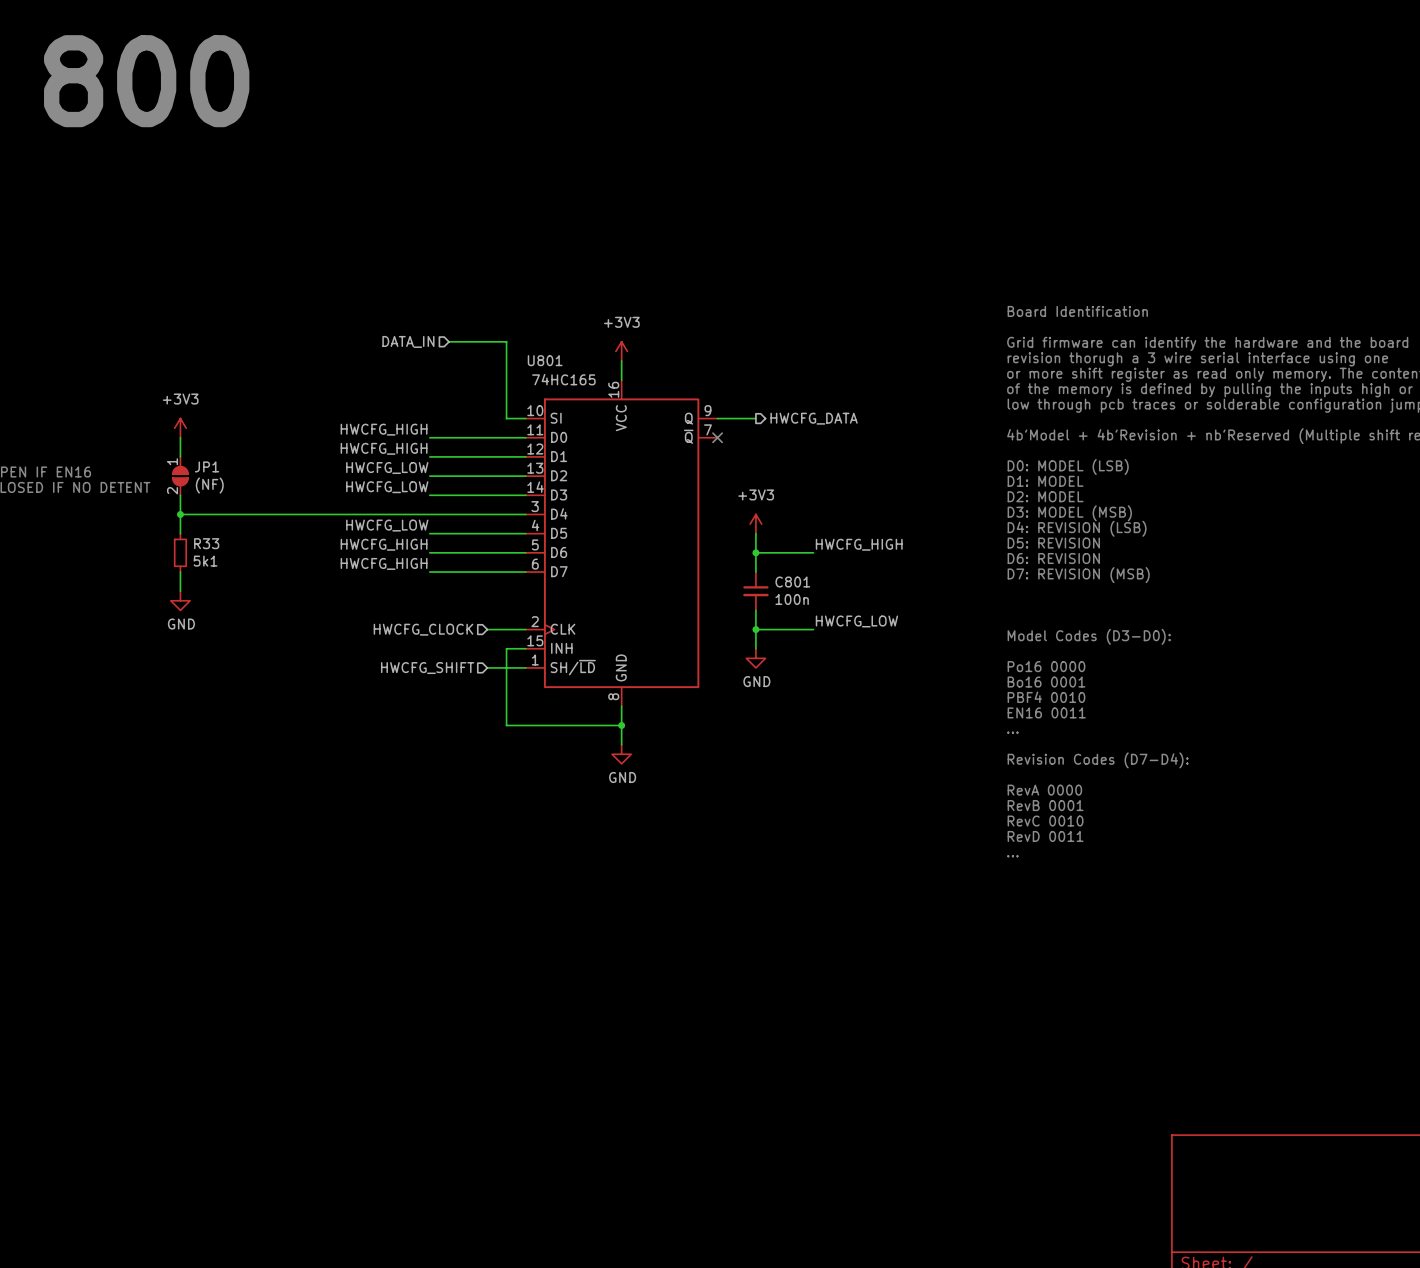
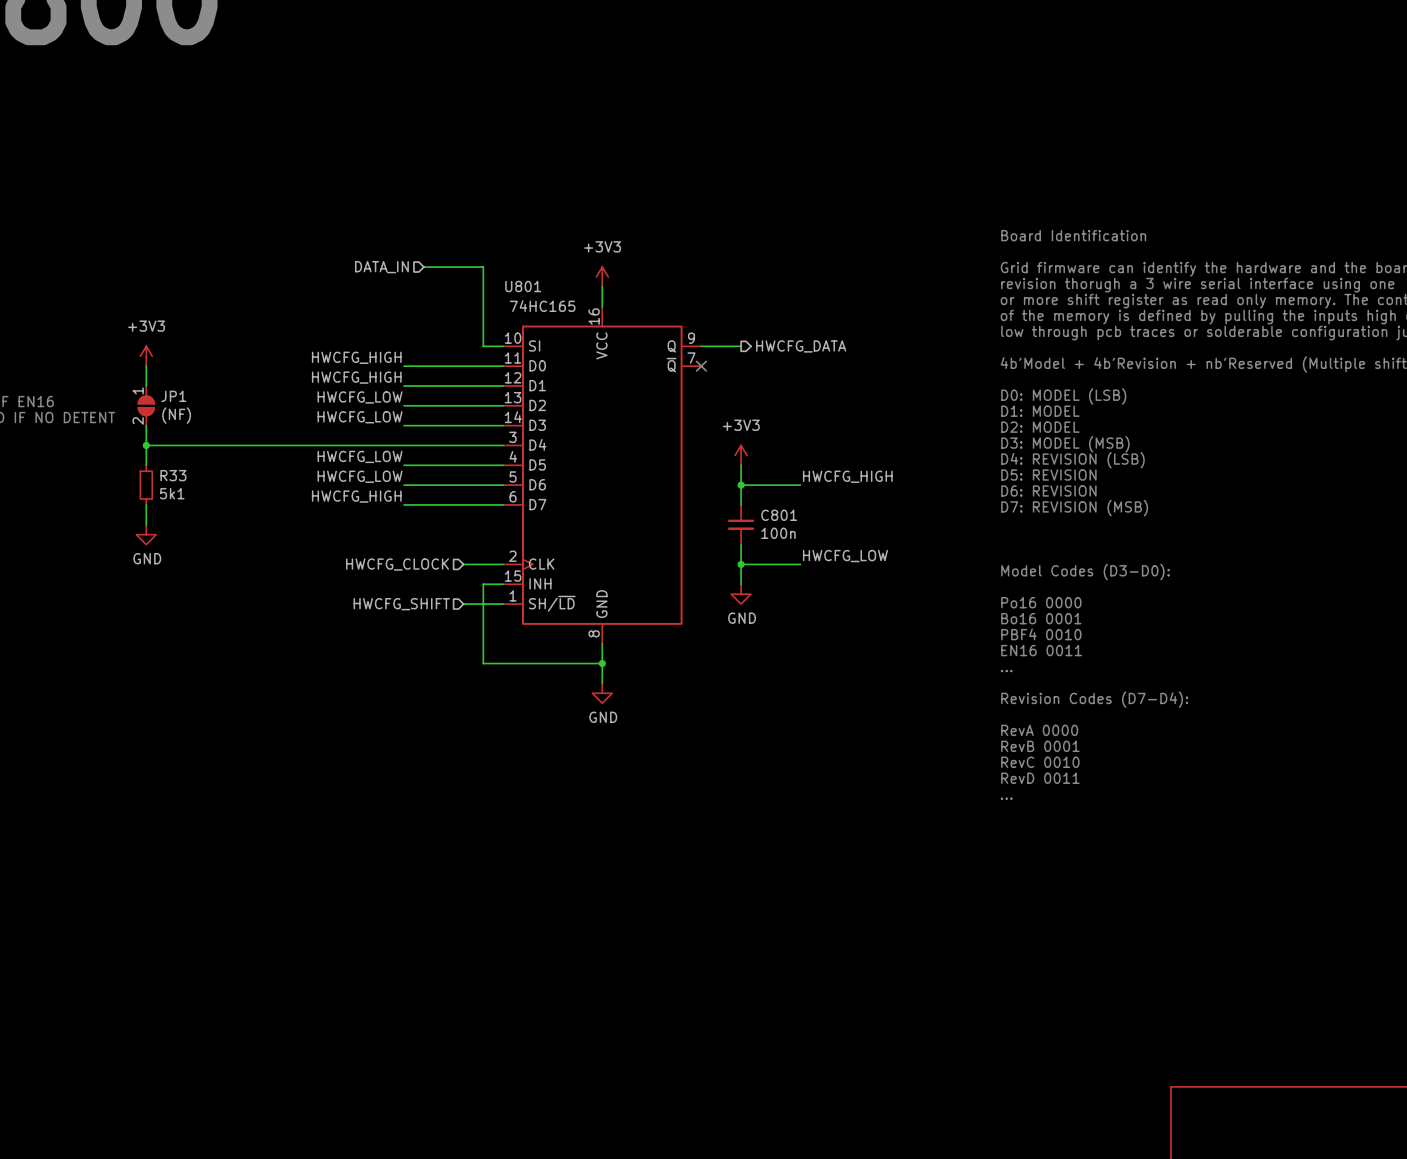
label: HWCFG_HIGH (384, 544) -> HWCFG_LOW (360, 476)

